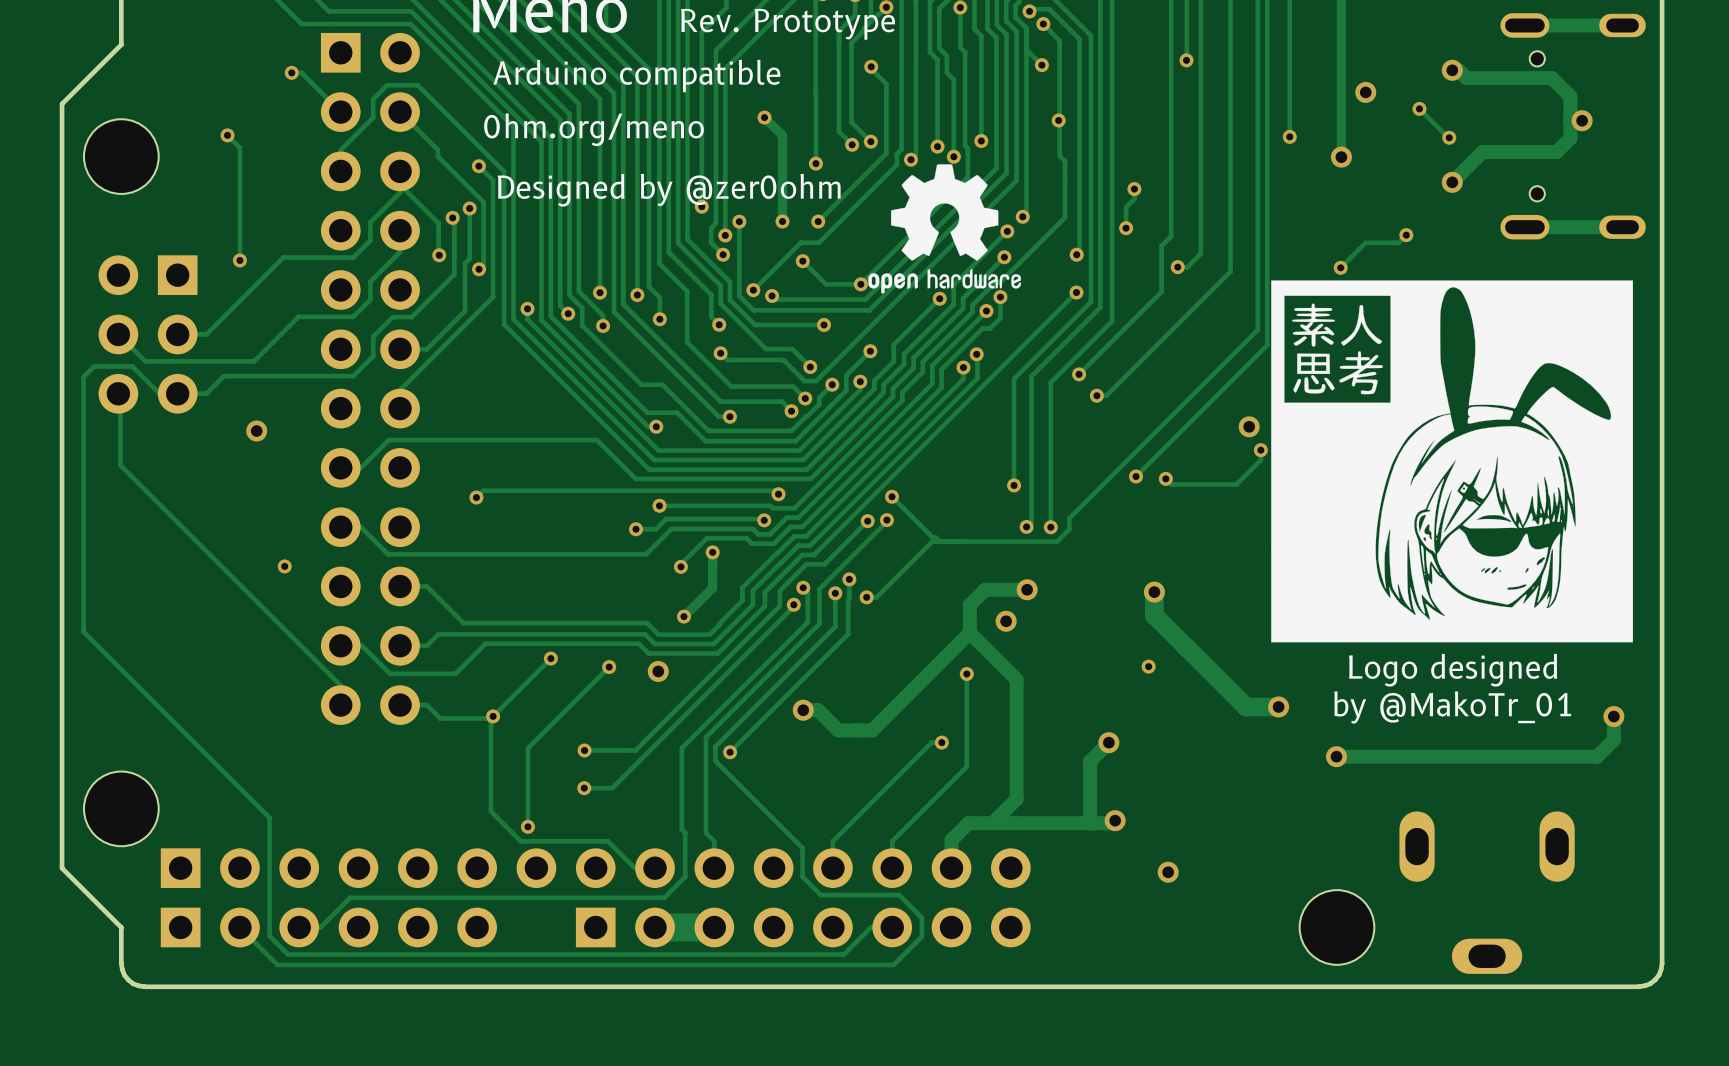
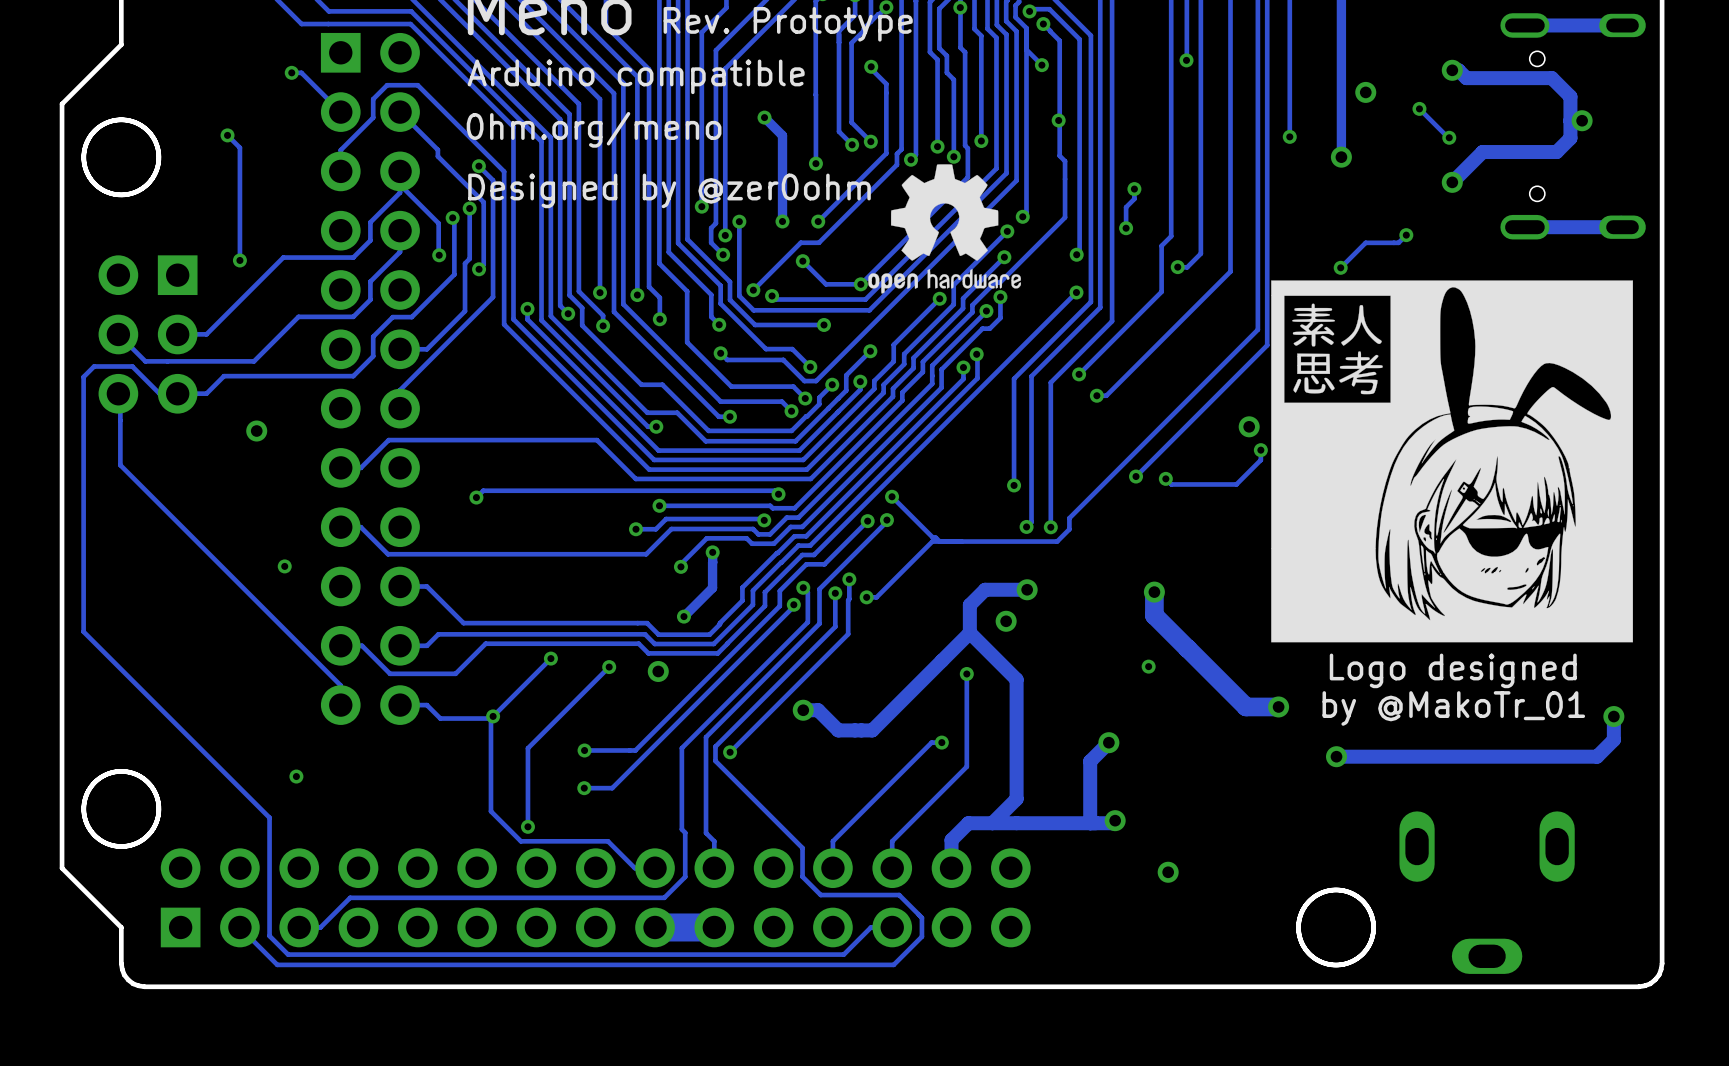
board edge: none -> (123, 119) (109, 121) (97, 128) (88, 139) (83, 154) (86, 170) (93, 182) (104, 191) (118, 194) (132, 193) (145, 186) (154, 175) (158, 160) (157, 146) (149, 132) (138, 123) (123, 119)
part: (121, 156) -> none
board edge: none -> (123, 771) (109, 773) (97, 780) (88, 791) (83, 806) (86, 821) (93, 834) (104, 842) (118, 846) (132, 844) (145, 837) (154, 826) (158, 811) (157, 797) (149, 784) (138, 775) (123, 771)
via: none -> (296, 776)
part: (121, 808) -> none
part: (595, 868) -> none
board edge: none -> (1339, 890) (1325, 891) (1312, 898) (1302, 909) (1298, 923) (1300, 939) (1307, 951) (1318, 960) (1332, 964) (1346, 963) (1359, 957) (1368, 946) (1373, 931) (1371, 916) (1365, 903) (1354, 894) (1339, 890)
part: none -> (595, 897)
part: (803, 927) -> none
part: (1336, 927) -> none

